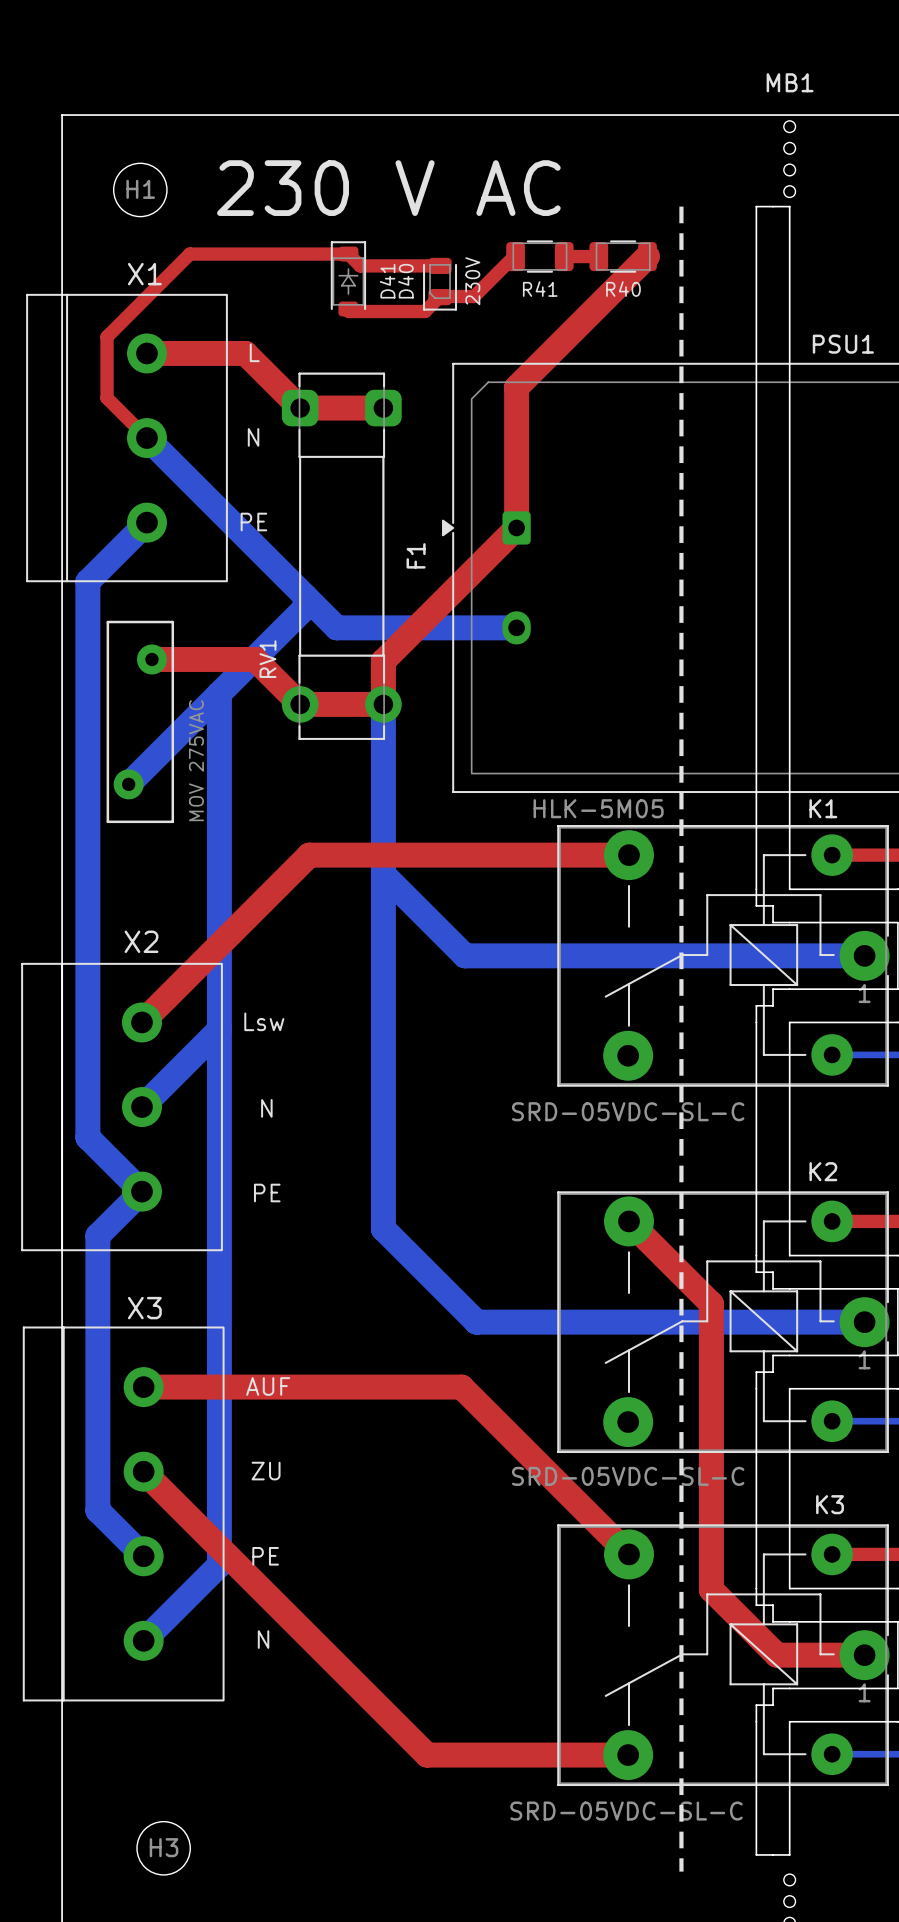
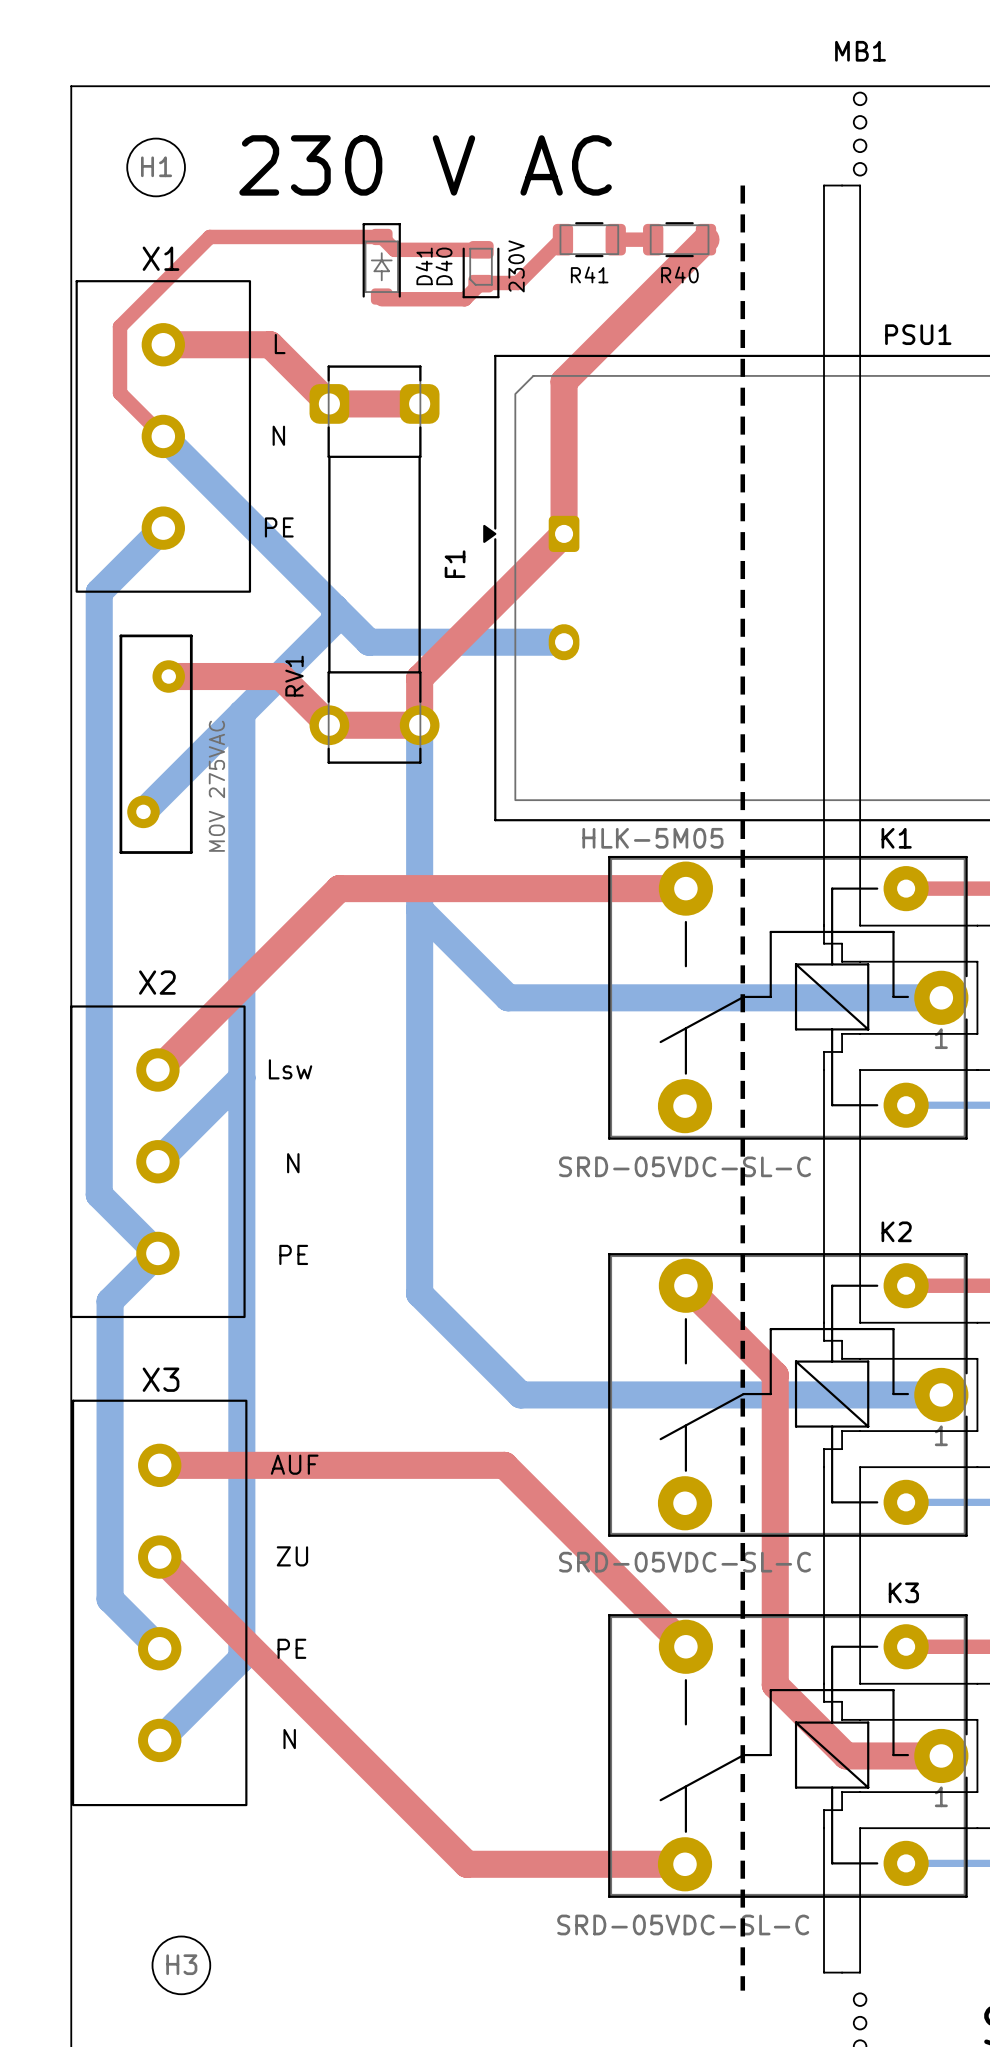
X1 footprint: [26, 293, 228, 583] -> [75, 280, 252, 593]
X2 footprint: [21, 962, 223, 1252] -> [70, 1005, 246, 1319]
X3 footprint: [22, 1326, 225, 1702] -> [71, 1399, 248, 1807]

